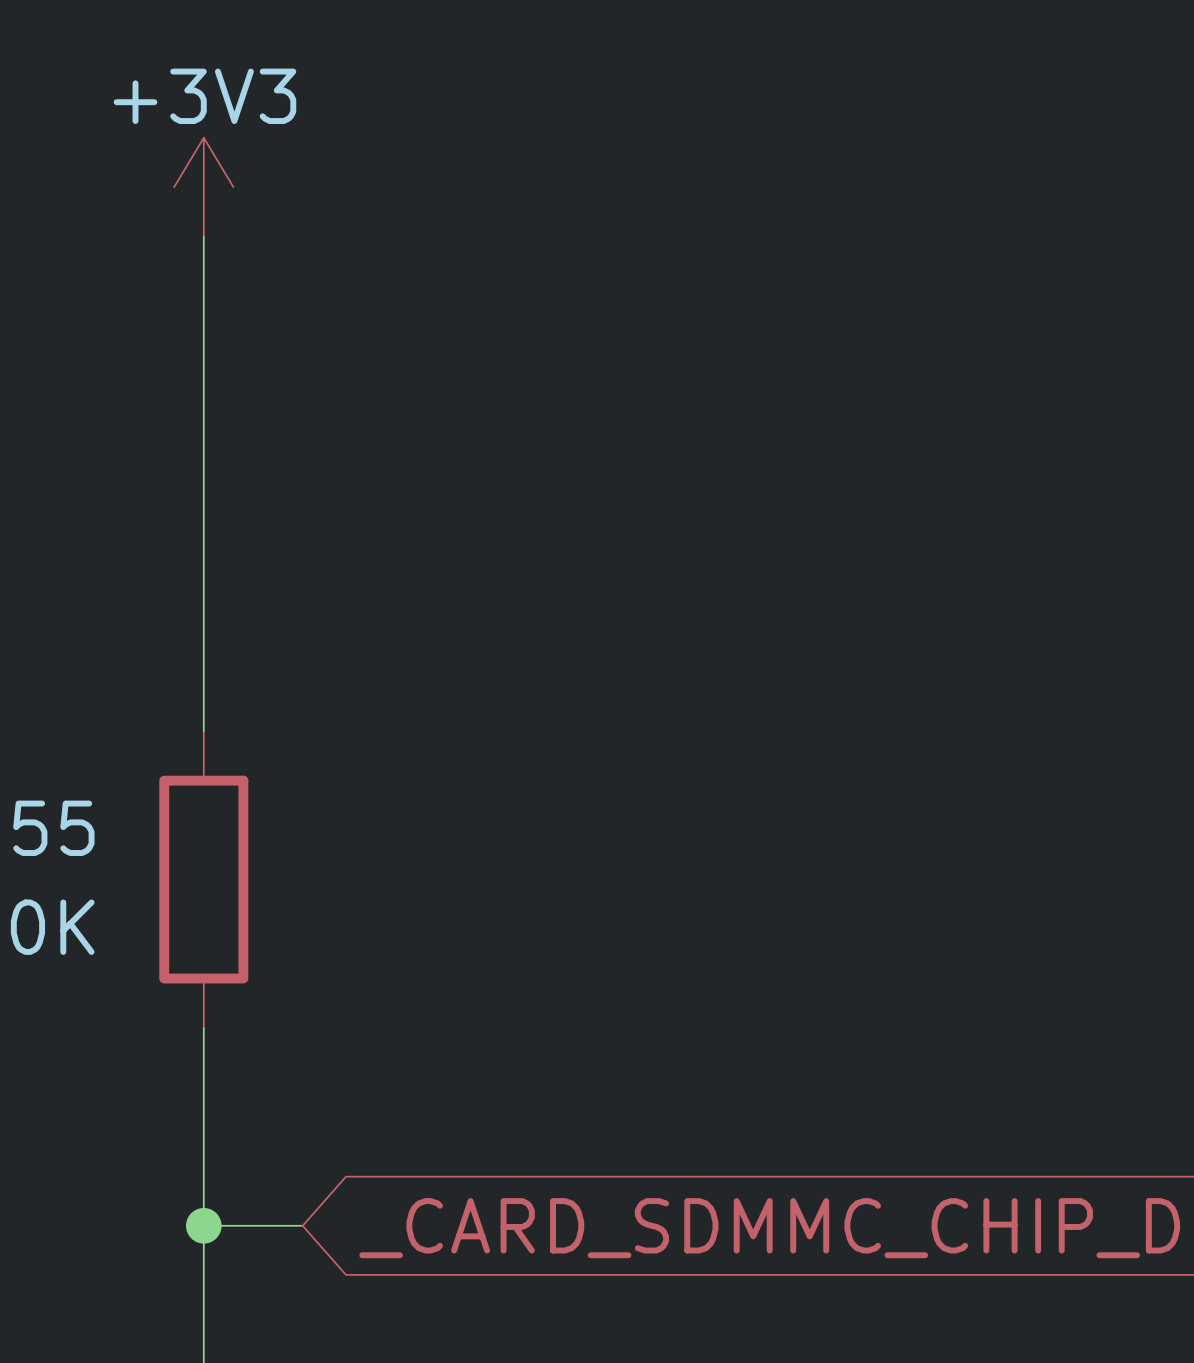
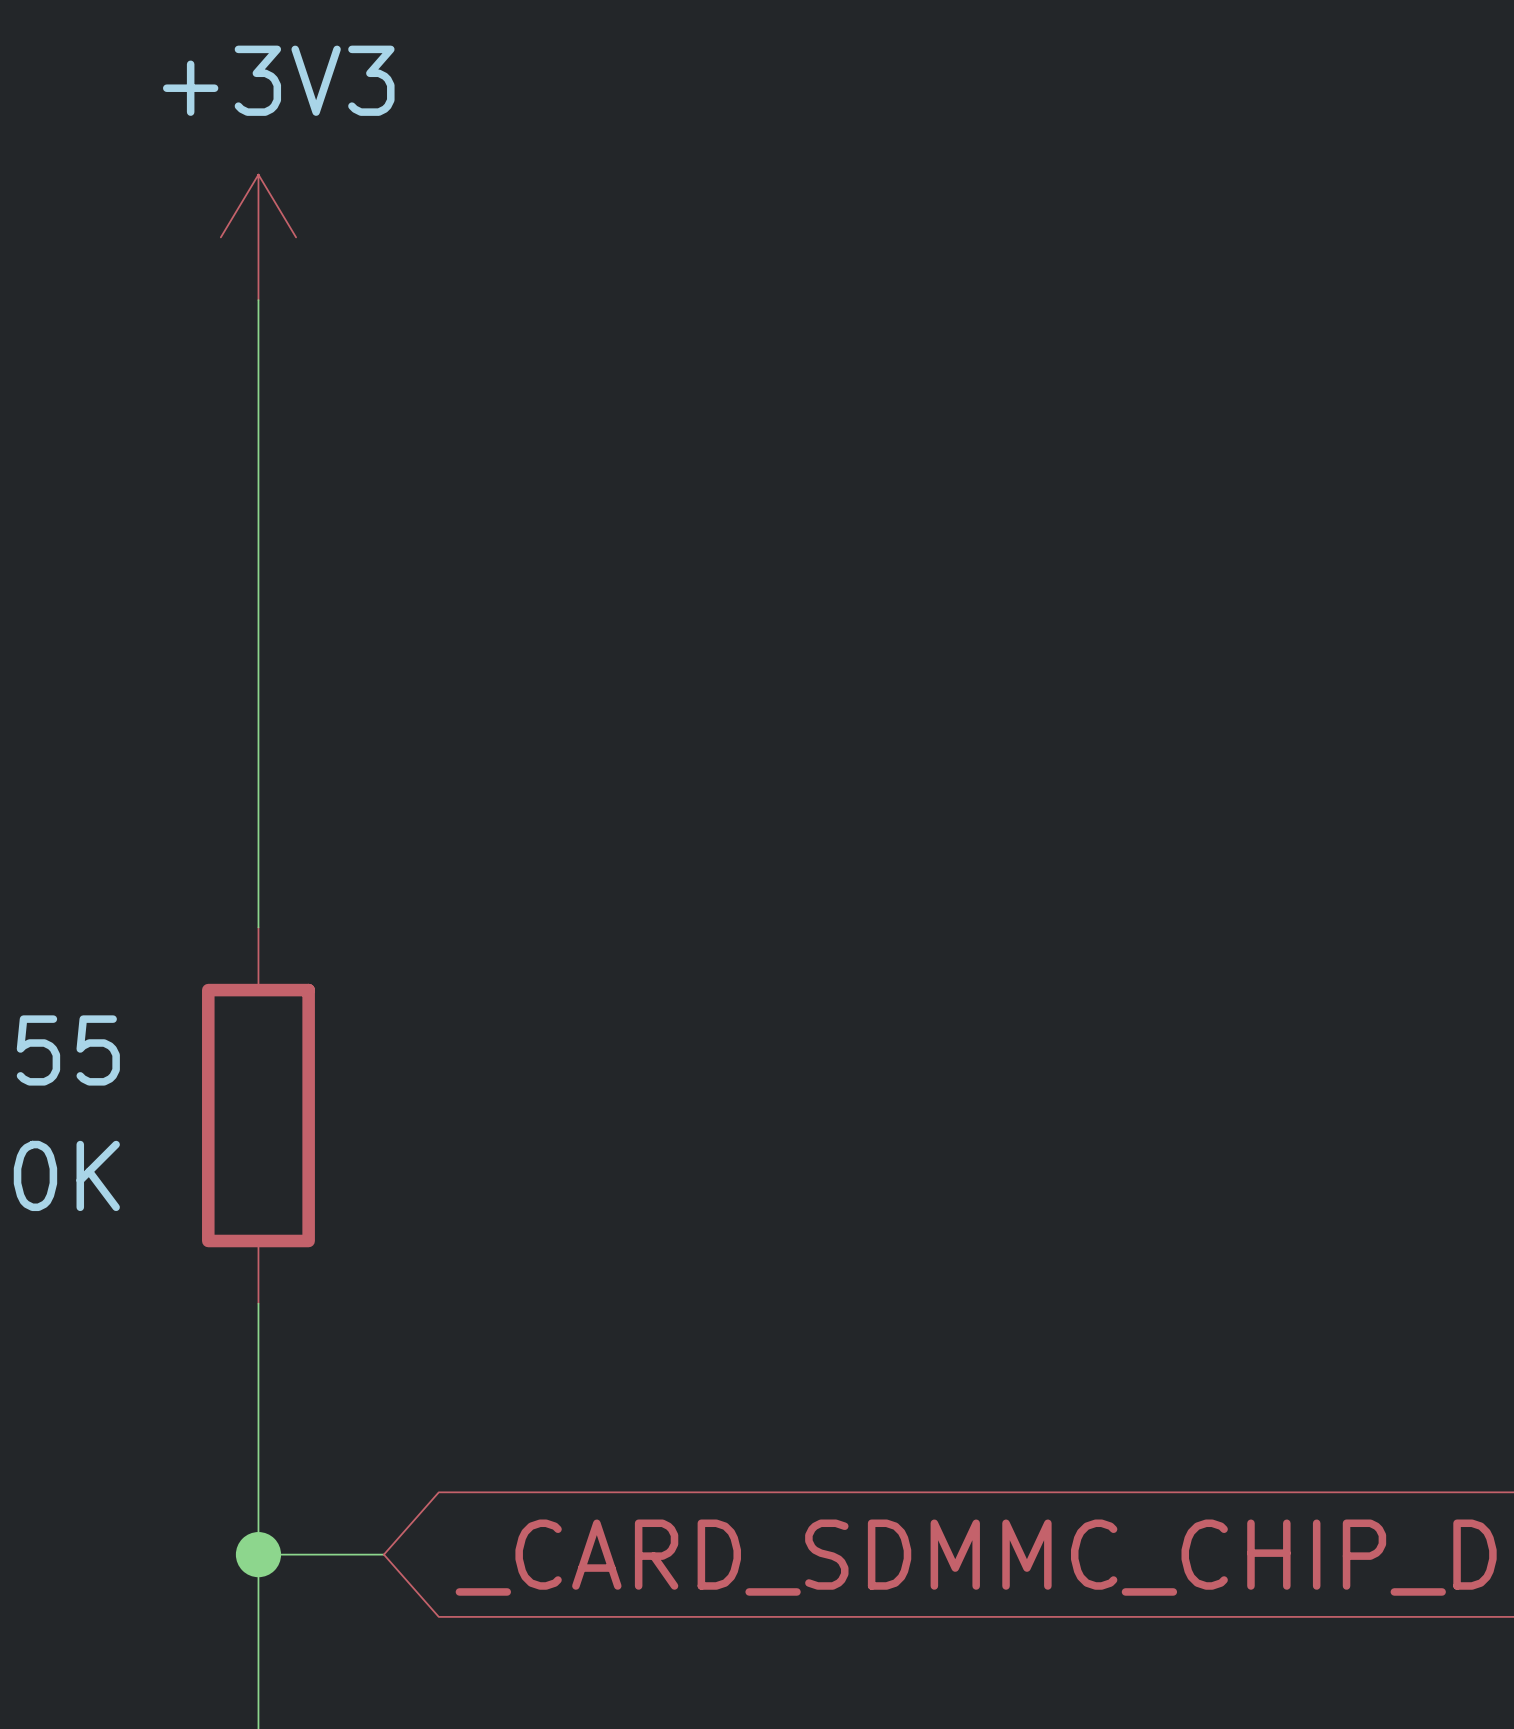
power symbol text position: +3V3 (204, 96) -> +3V3 (278, 80)

